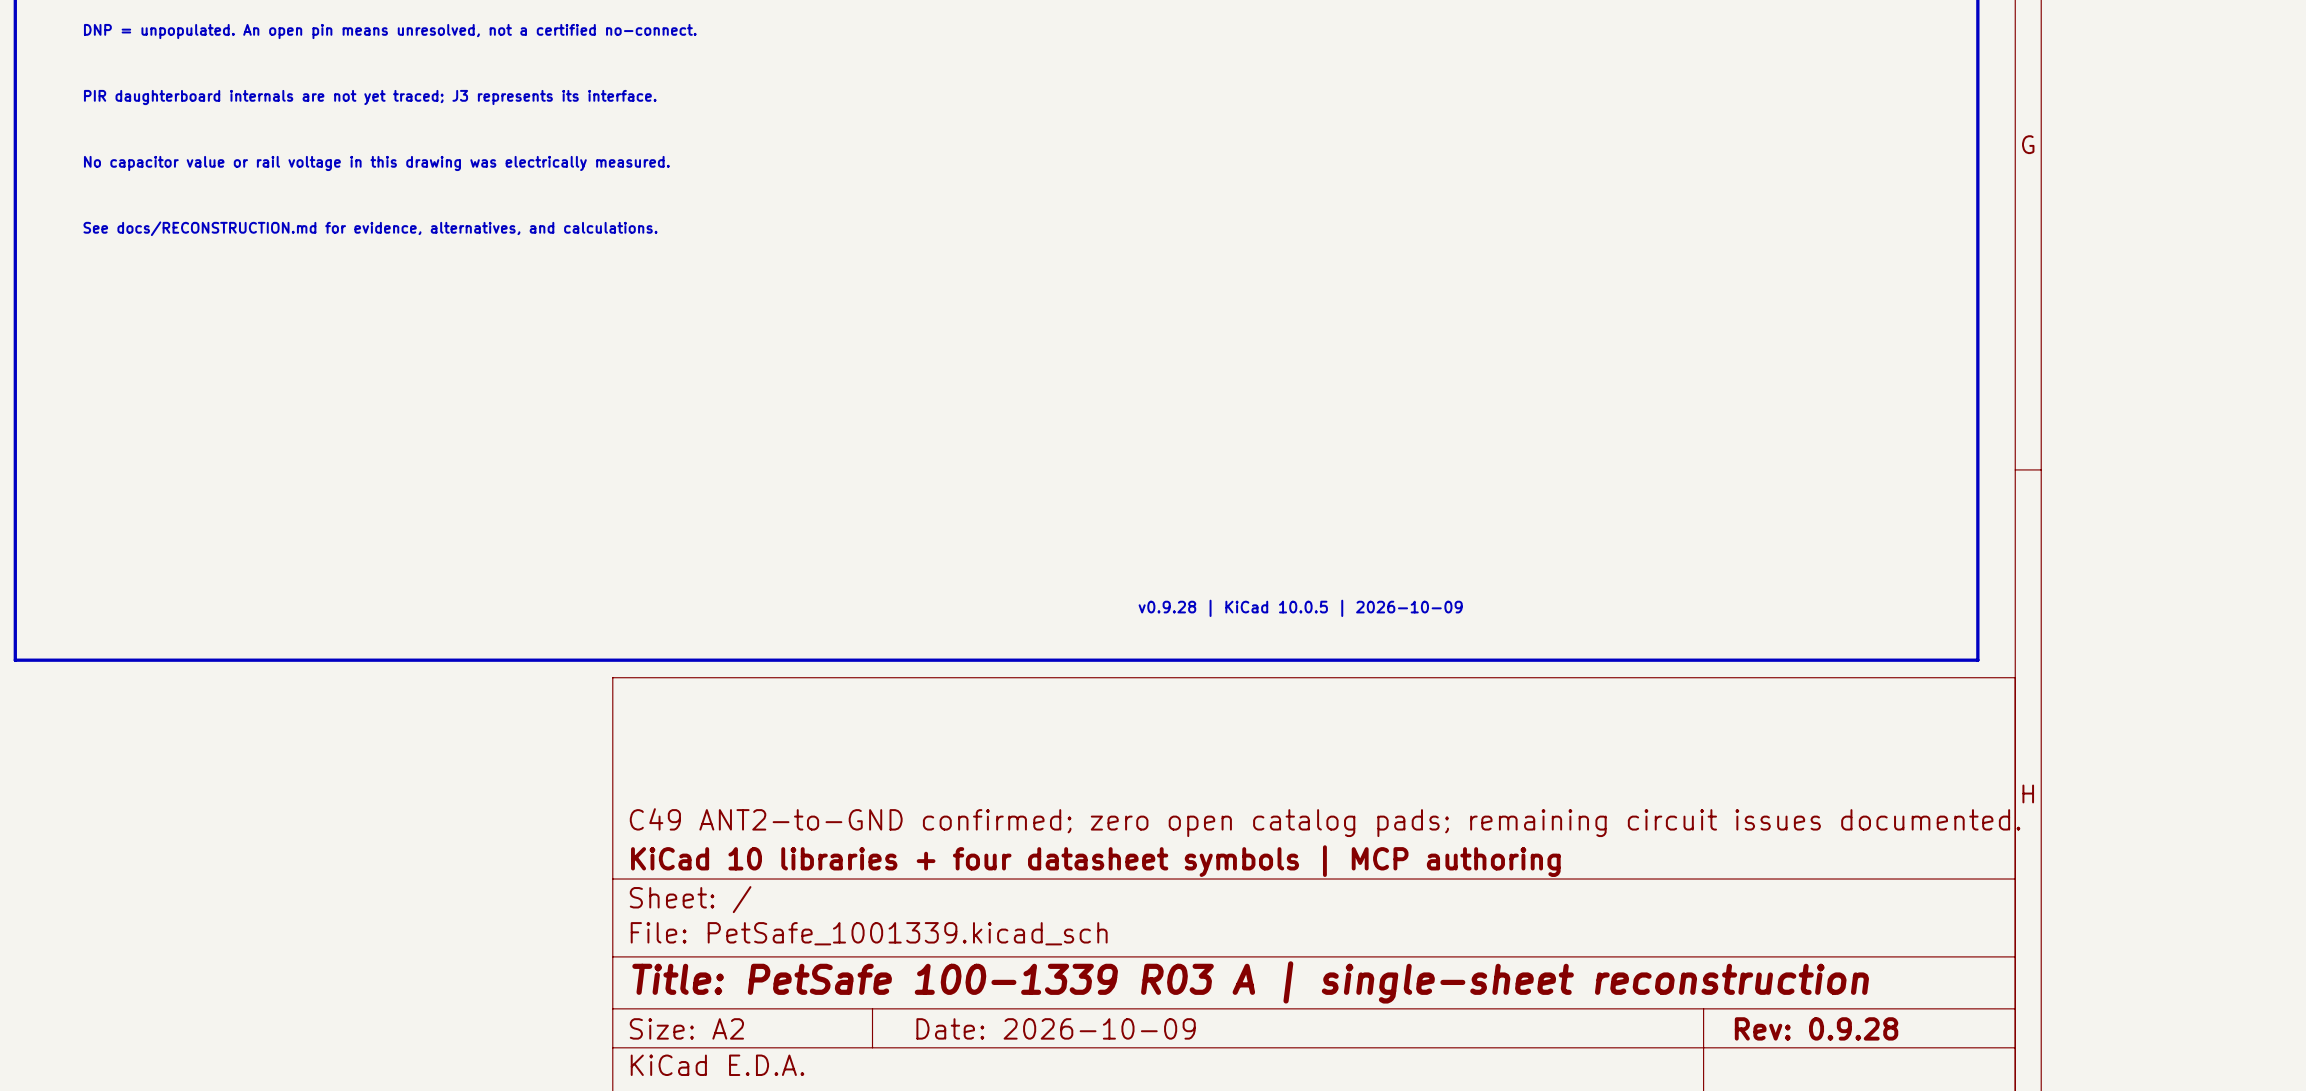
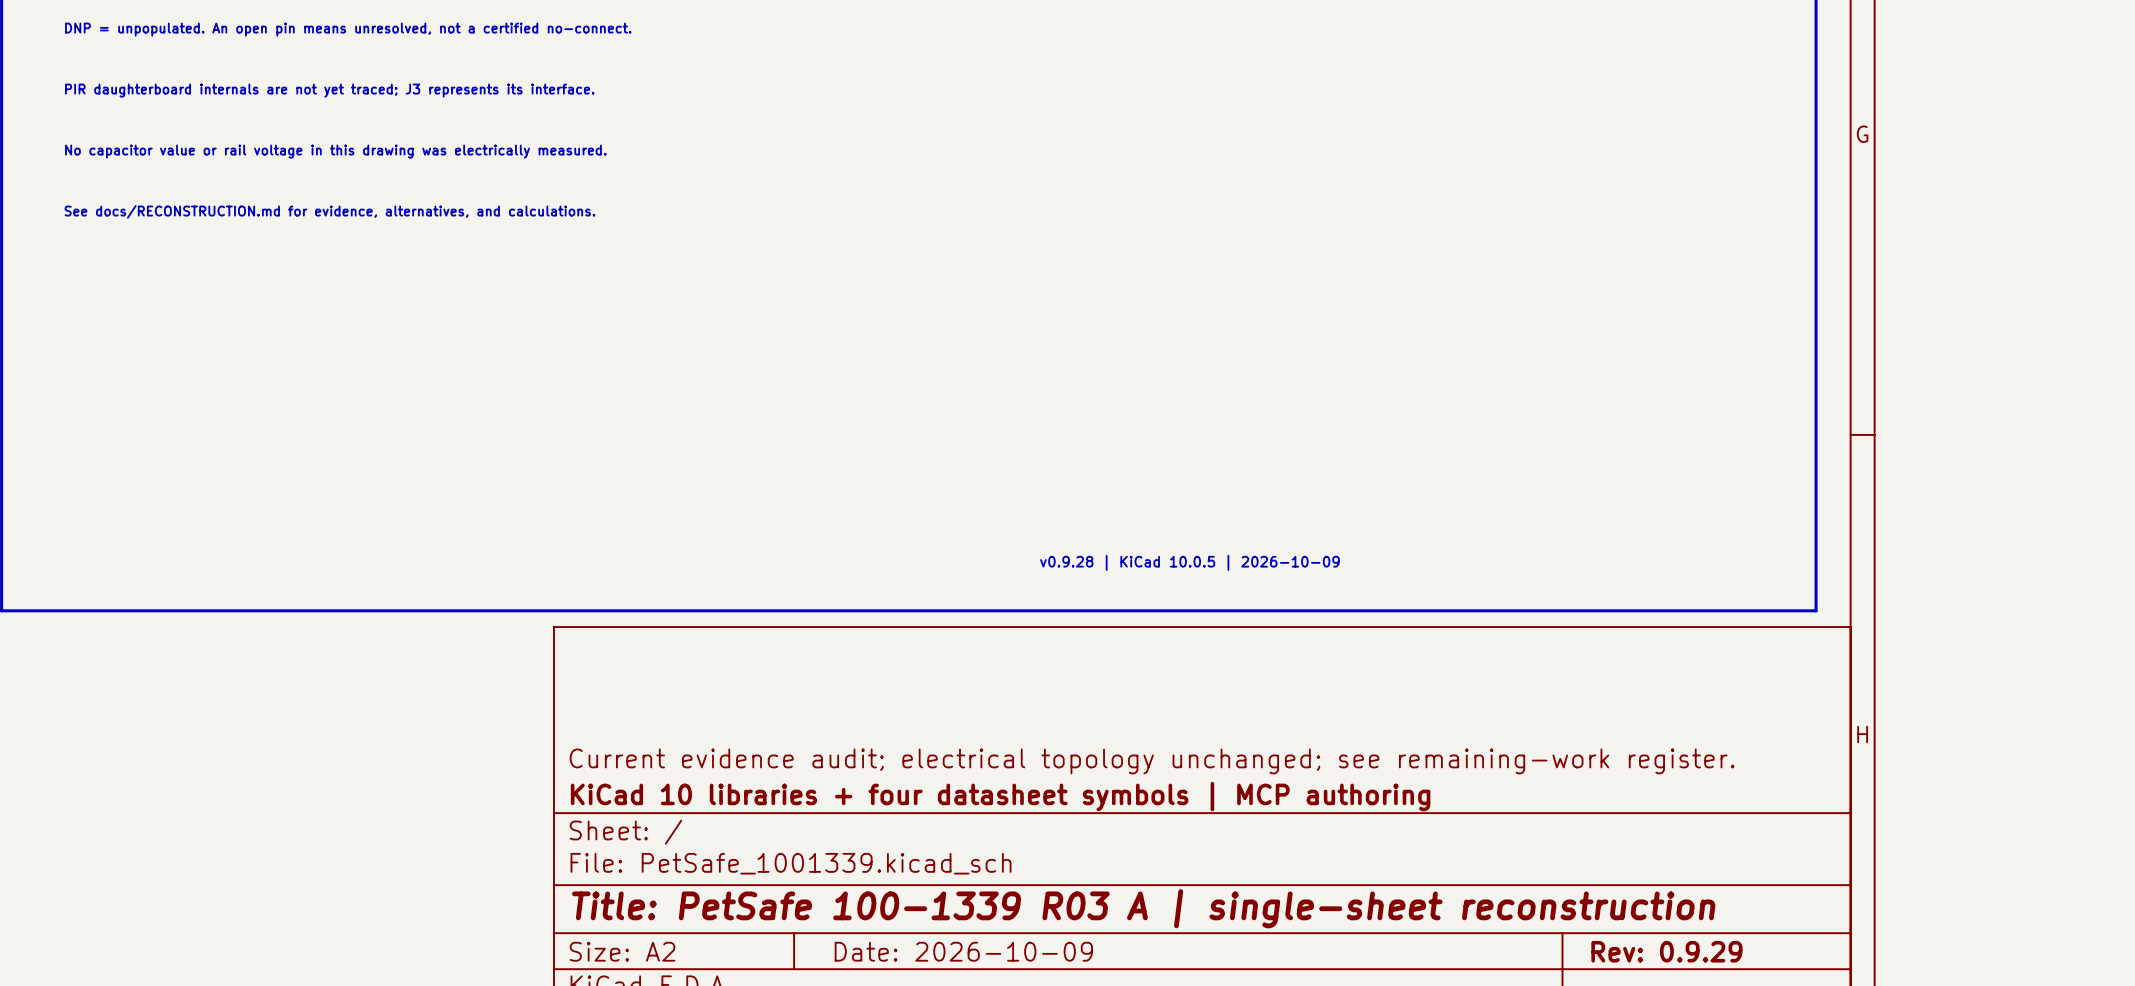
title block: C49 ANT2-to-GND confirmed; zero open catalog pads; remaining circuit issues documented. (1325, 822) -> Current evidence audit; electrical topology unchanged; see remaining-work register. (1152, 761)
title block: Rev: 0.9.28 (1816, 1028) -> Rev: 0.9.29 (1666, 951)

